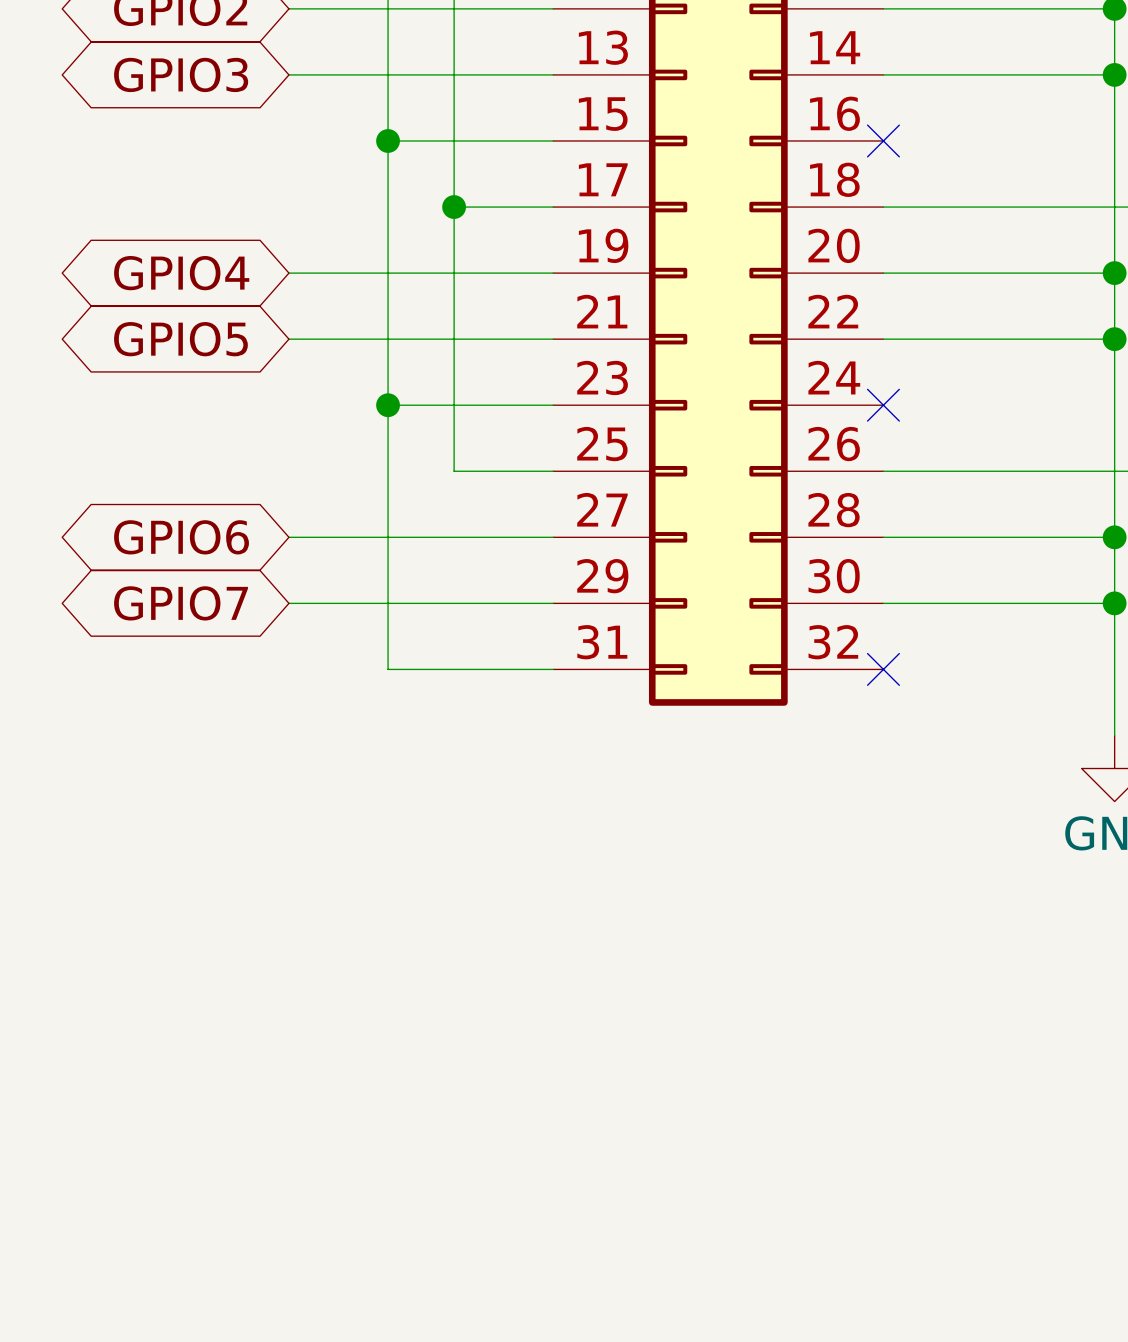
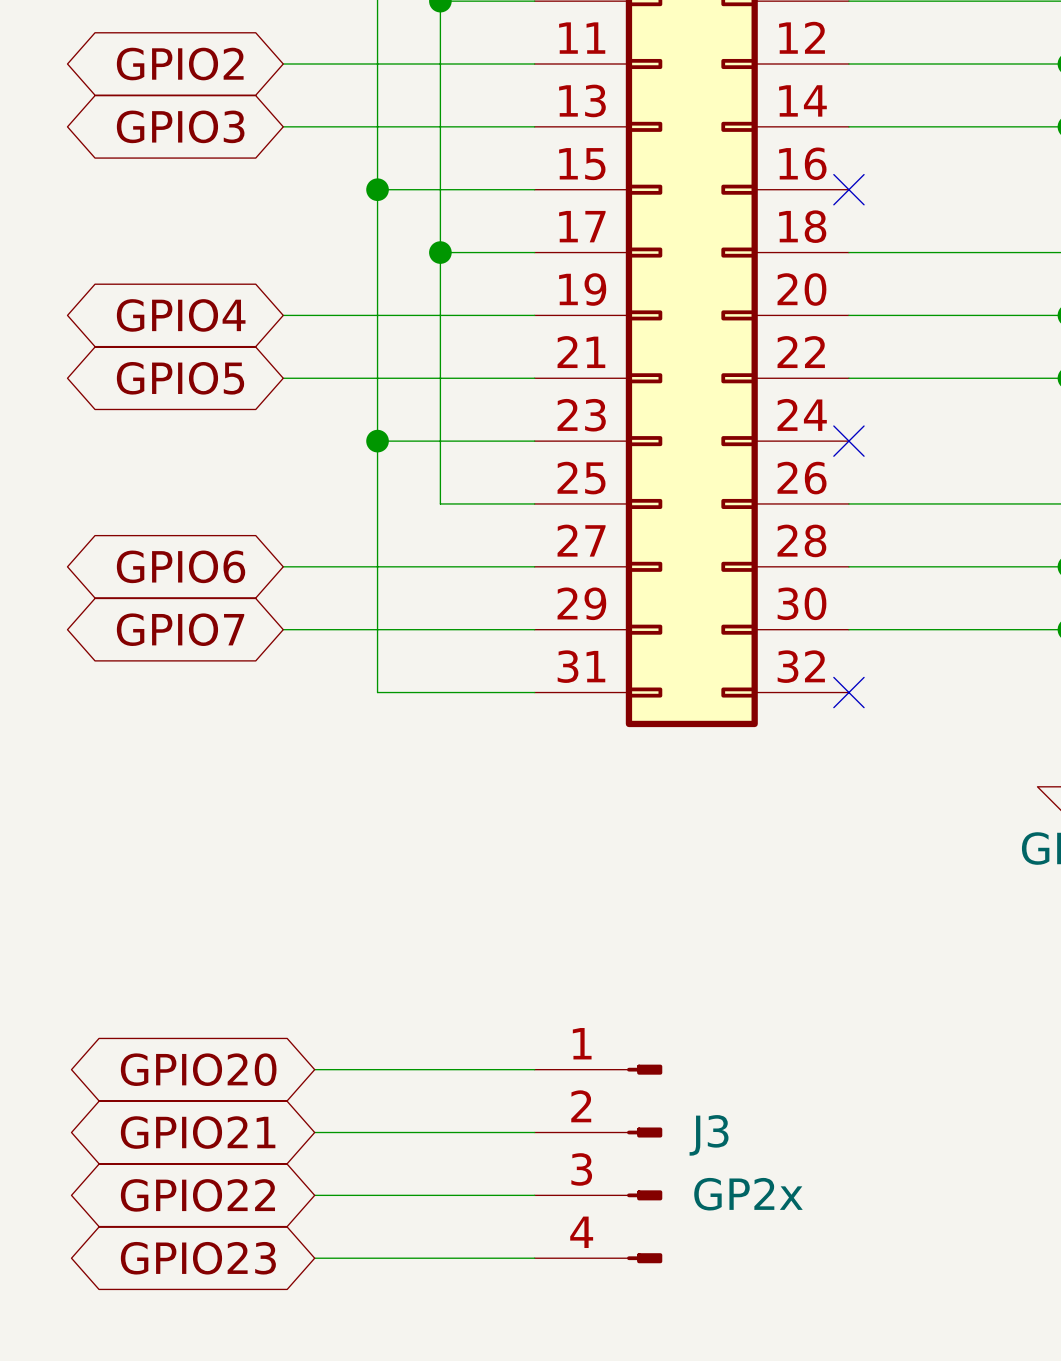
global label: none -> GPIO20 (198, 1069)
wire: none -> (314, 1069) (534, 1069)
global label: none -> GPIO21 (198, 1132)
wire: none -> (314, 1132) (534, 1132)
J3: none -> GP2x (598, 1163)
global label: none -> GPIO22 (197, 1195)
wire: none -> (314, 1195) (534, 1195)
global label: none -> GPIO23 (198, 1258)
wire: none -> (314, 1258) (534, 1258)

